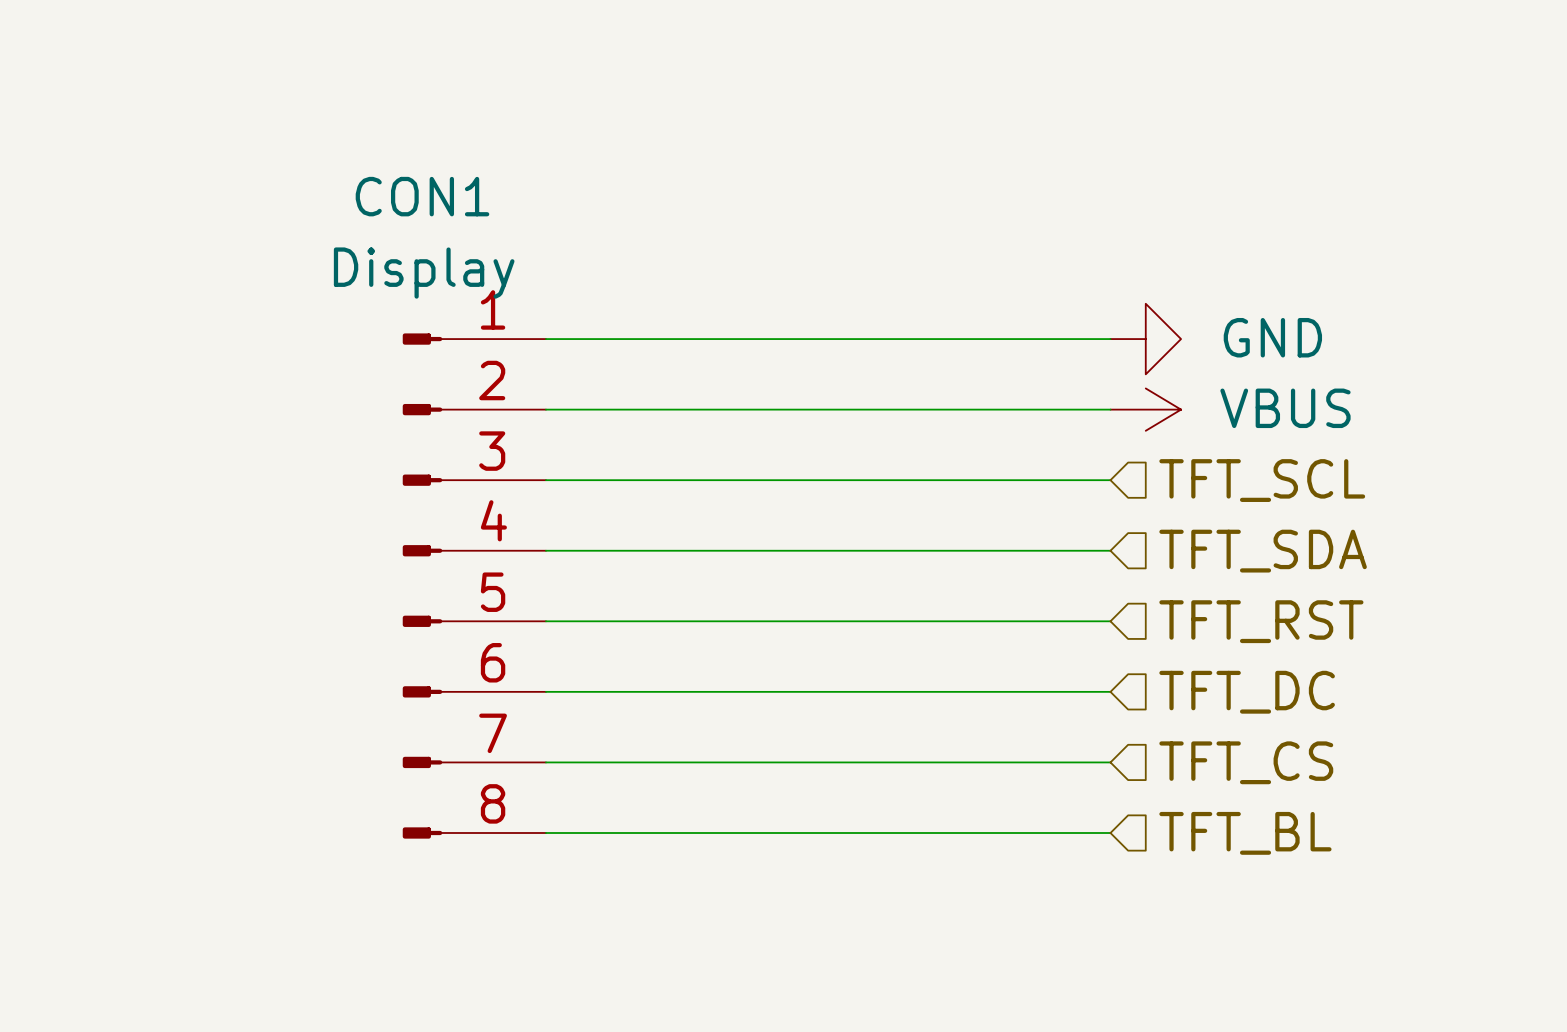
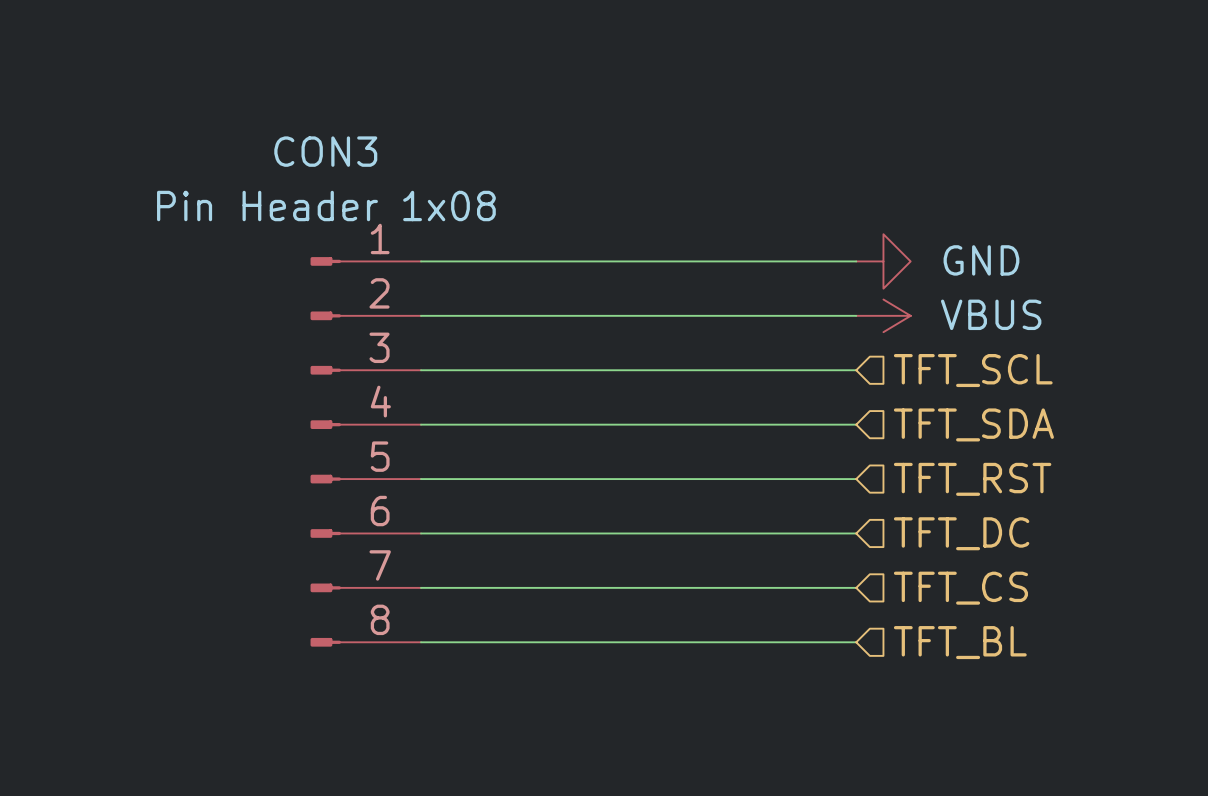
CON1 name: CON1 (422, 196) -> CON3 (325, 151)
CON1 value: Display (424, 273) -> Pin Header 1x08 (326, 206)

